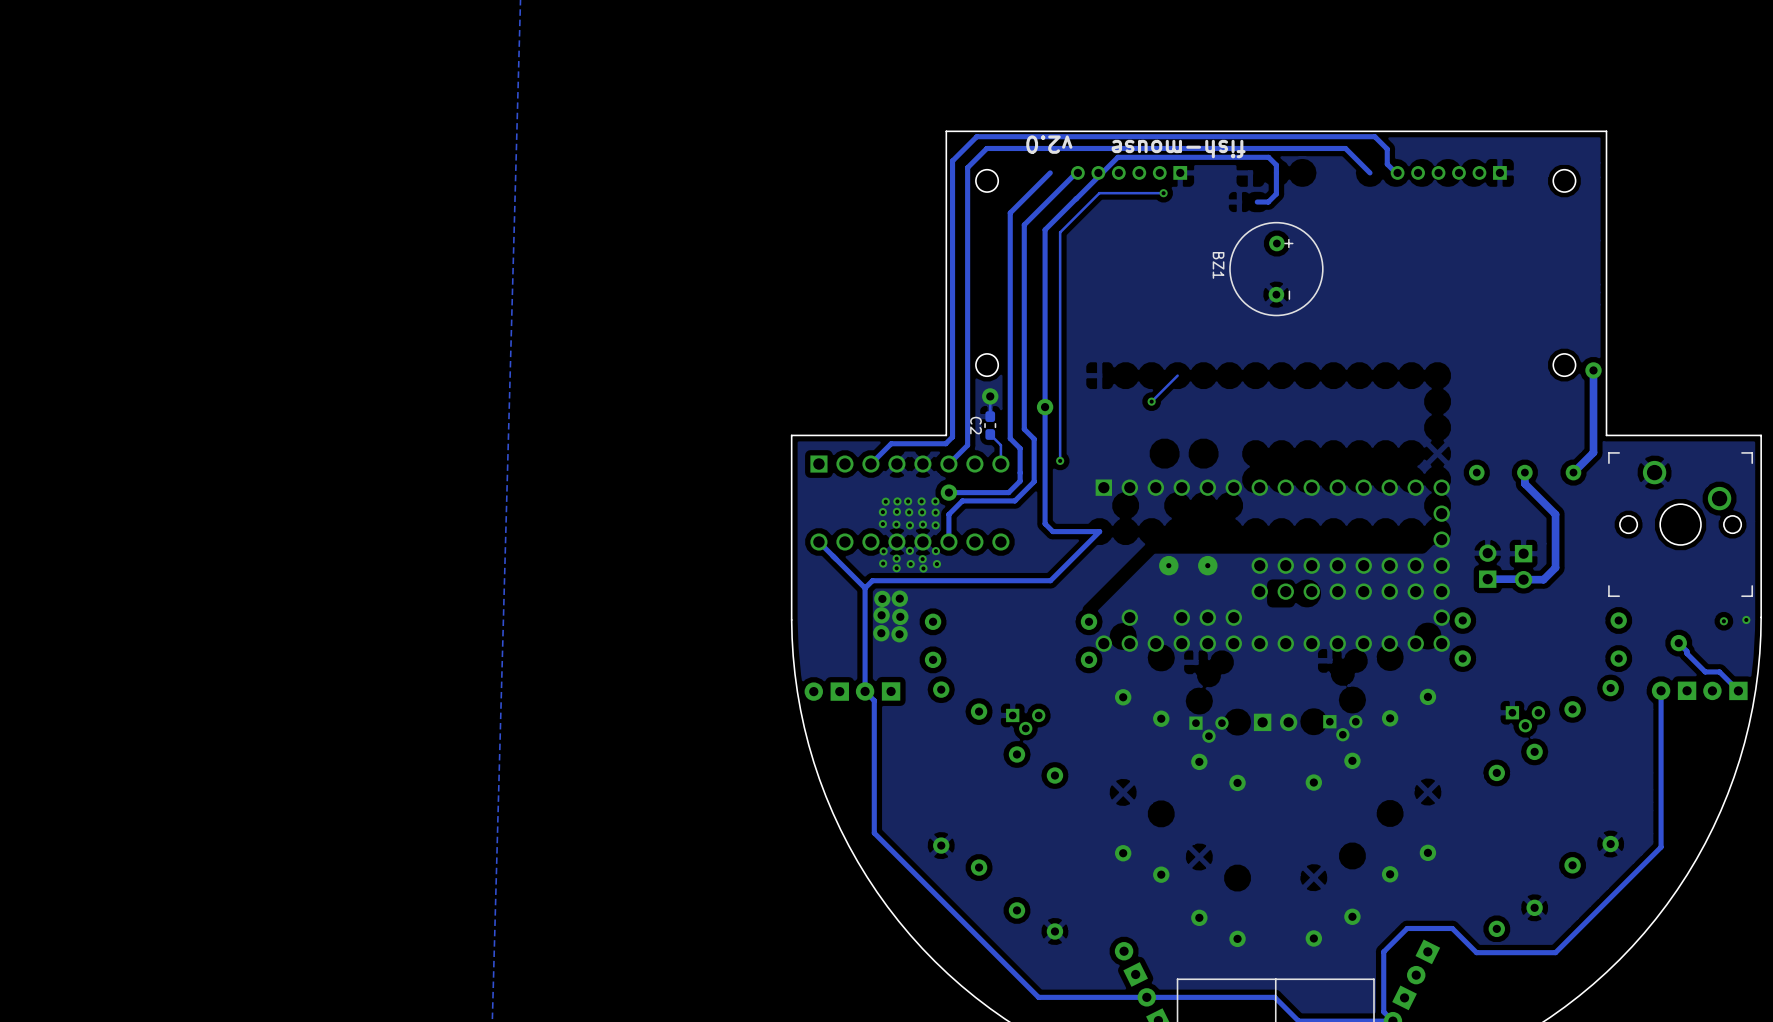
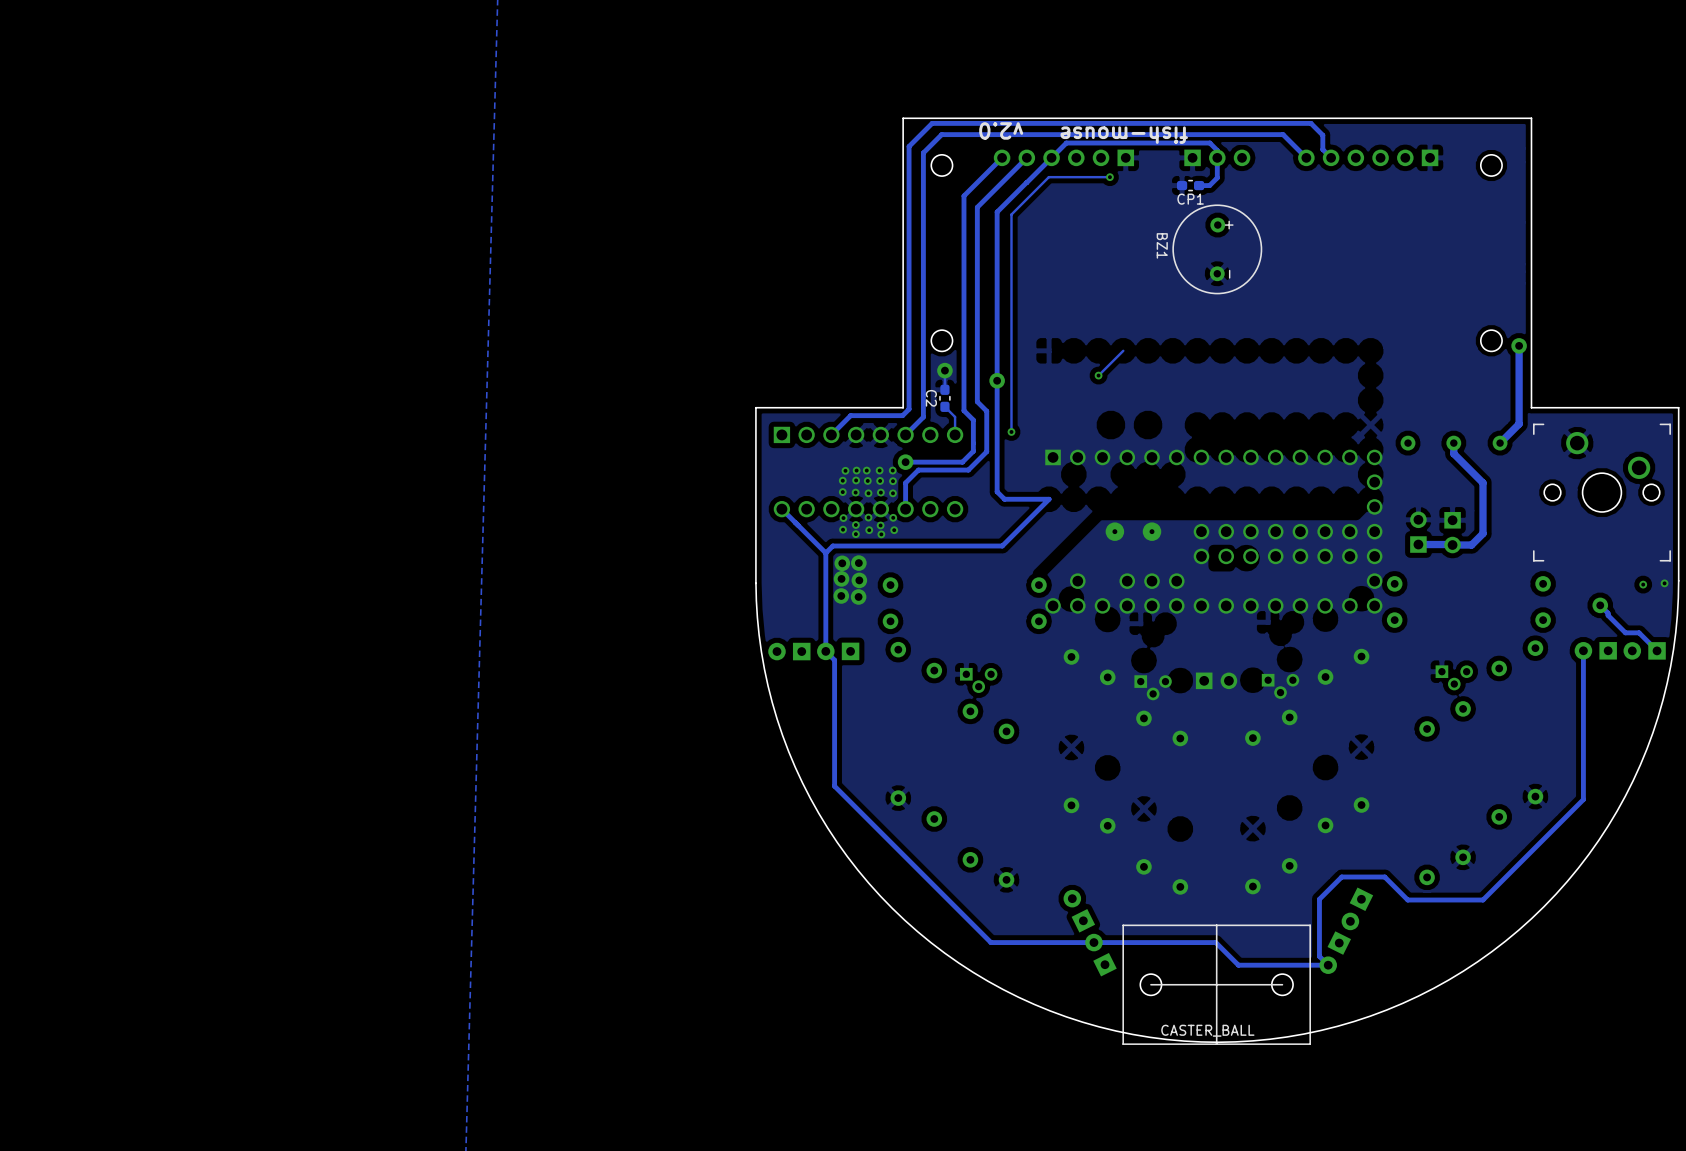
part: none -> (1063, 157)
part: (1129, 172) -> none
part: none -> (1217, 157)
part: none -> (1368, 157)
part: (1448, 172) -> none
CP1: none -> (1190, 185)

